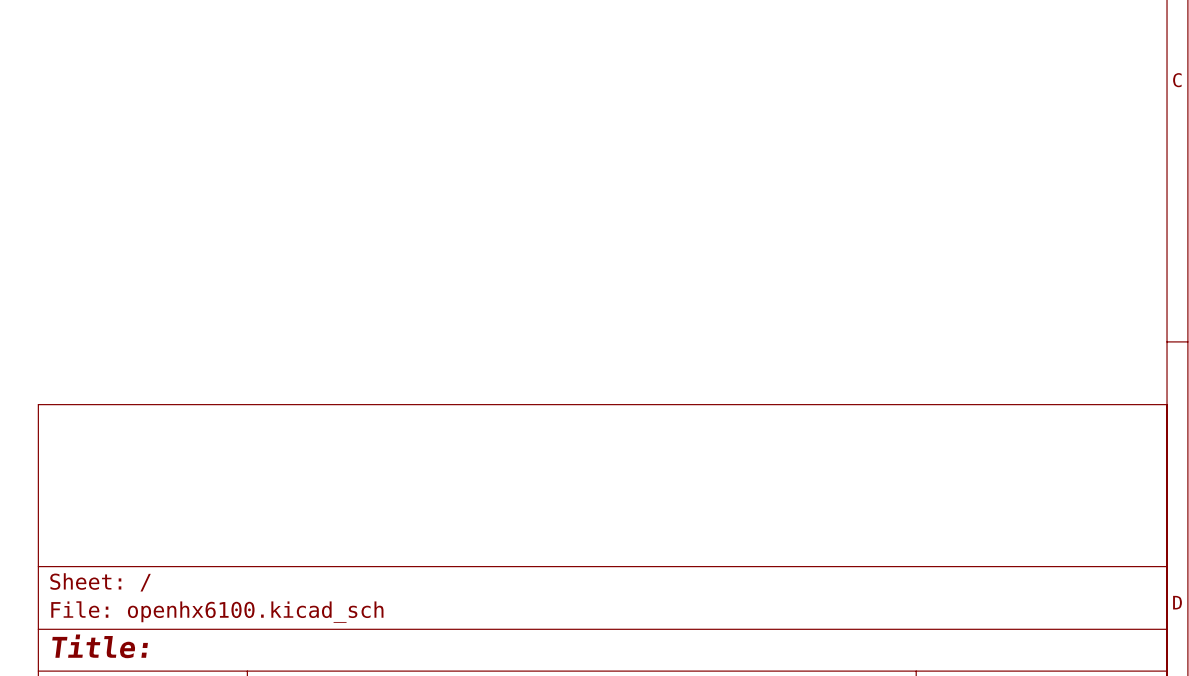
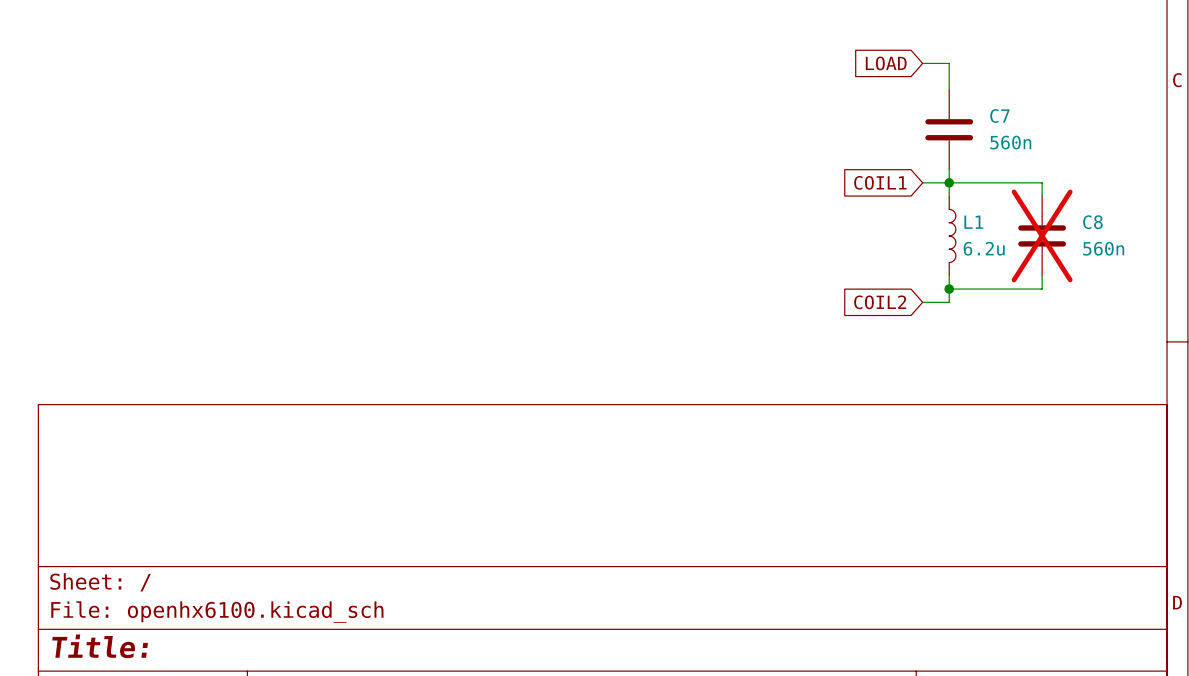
global label: none -> LOAD (886, 63)
wire: none -> (922, 63) (949, 63) (949, 89)
C7: none -> 560n (949, 129)
wire: none -> (949, 169) (949, 196)
global label: none -> COIL1 (880, 182)
wire: none -> (922, 182) (1042, 182) (1042, 196)
junction: none -> (949, 182)
L1: none -> 6.2u (952, 235)
C8: none -> 560n (1042, 235)
wire: none -> (949, 275) (949, 302) (922, 302)
wire: none -> (1042, 275) (1042, 289) (949, 289)
junction: none -> (949, 289)
global label: none -> COIL2 (880, 302)

